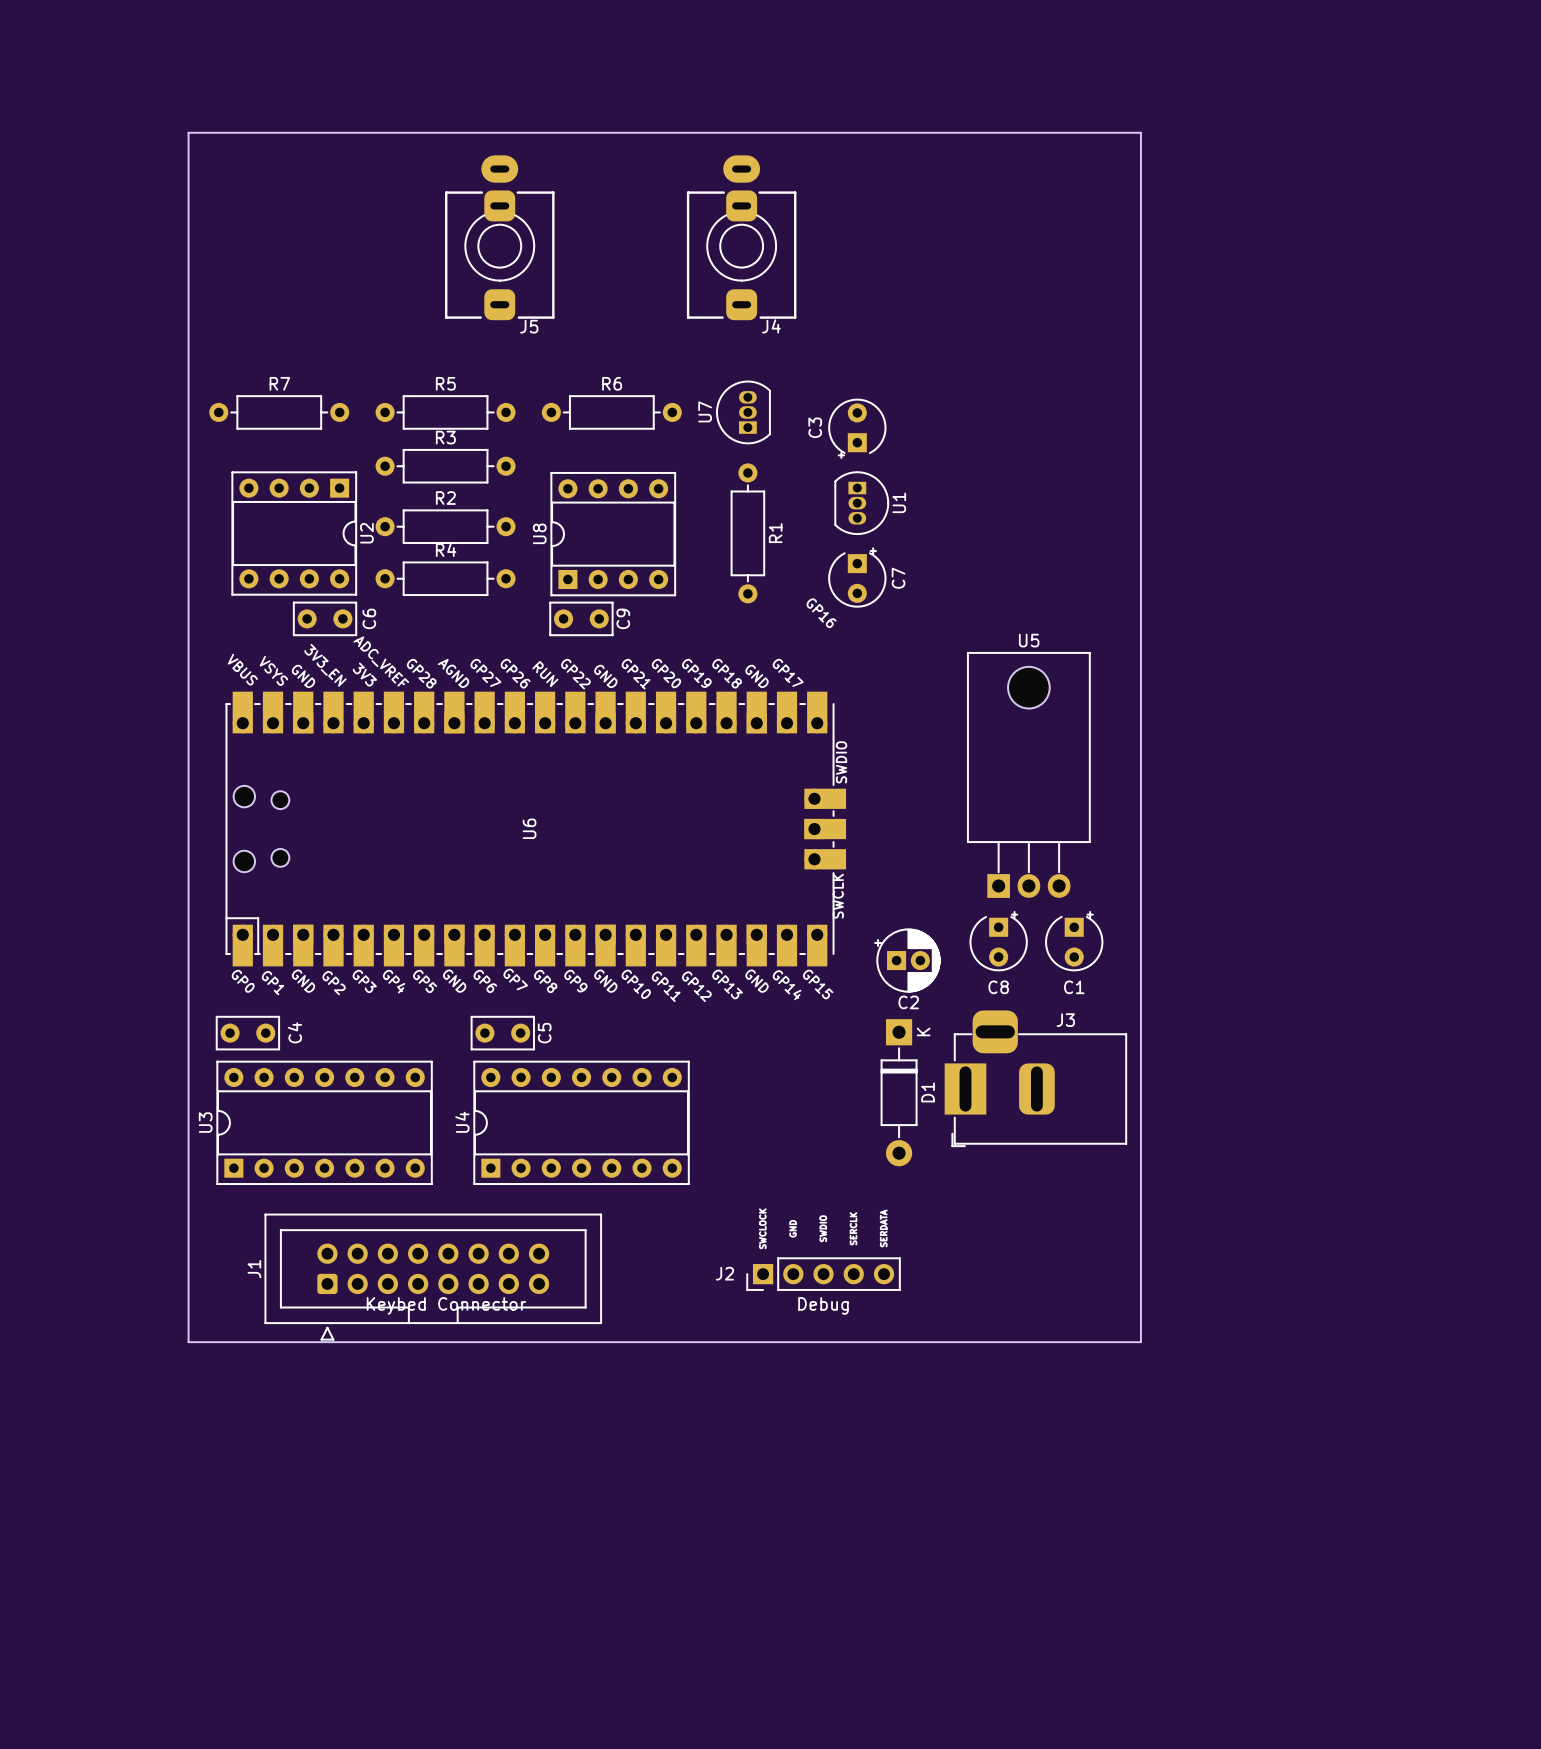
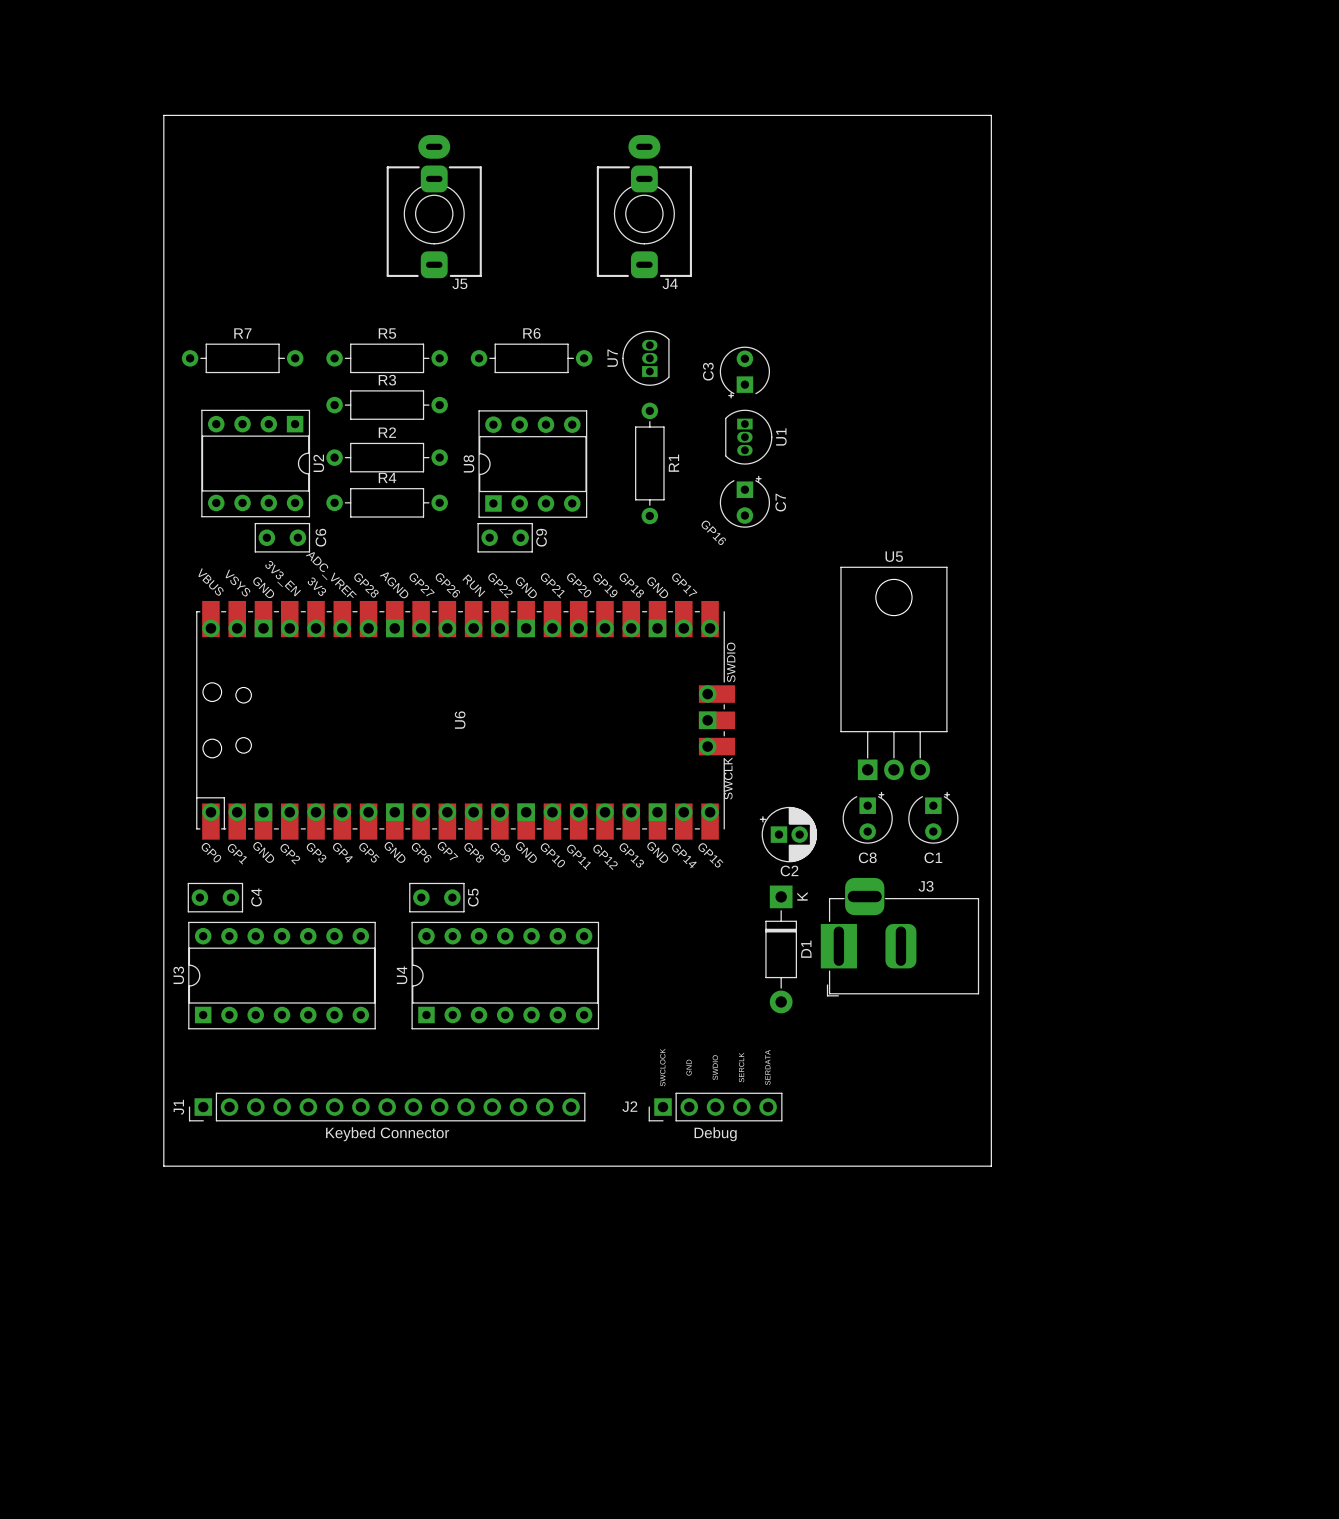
J1 footprint: [264, 1213, 602, 1341] -> [188, 1092, 586, 1122]
J1 name position: J1 (254, 1269) -> J1 (178, 1107)

